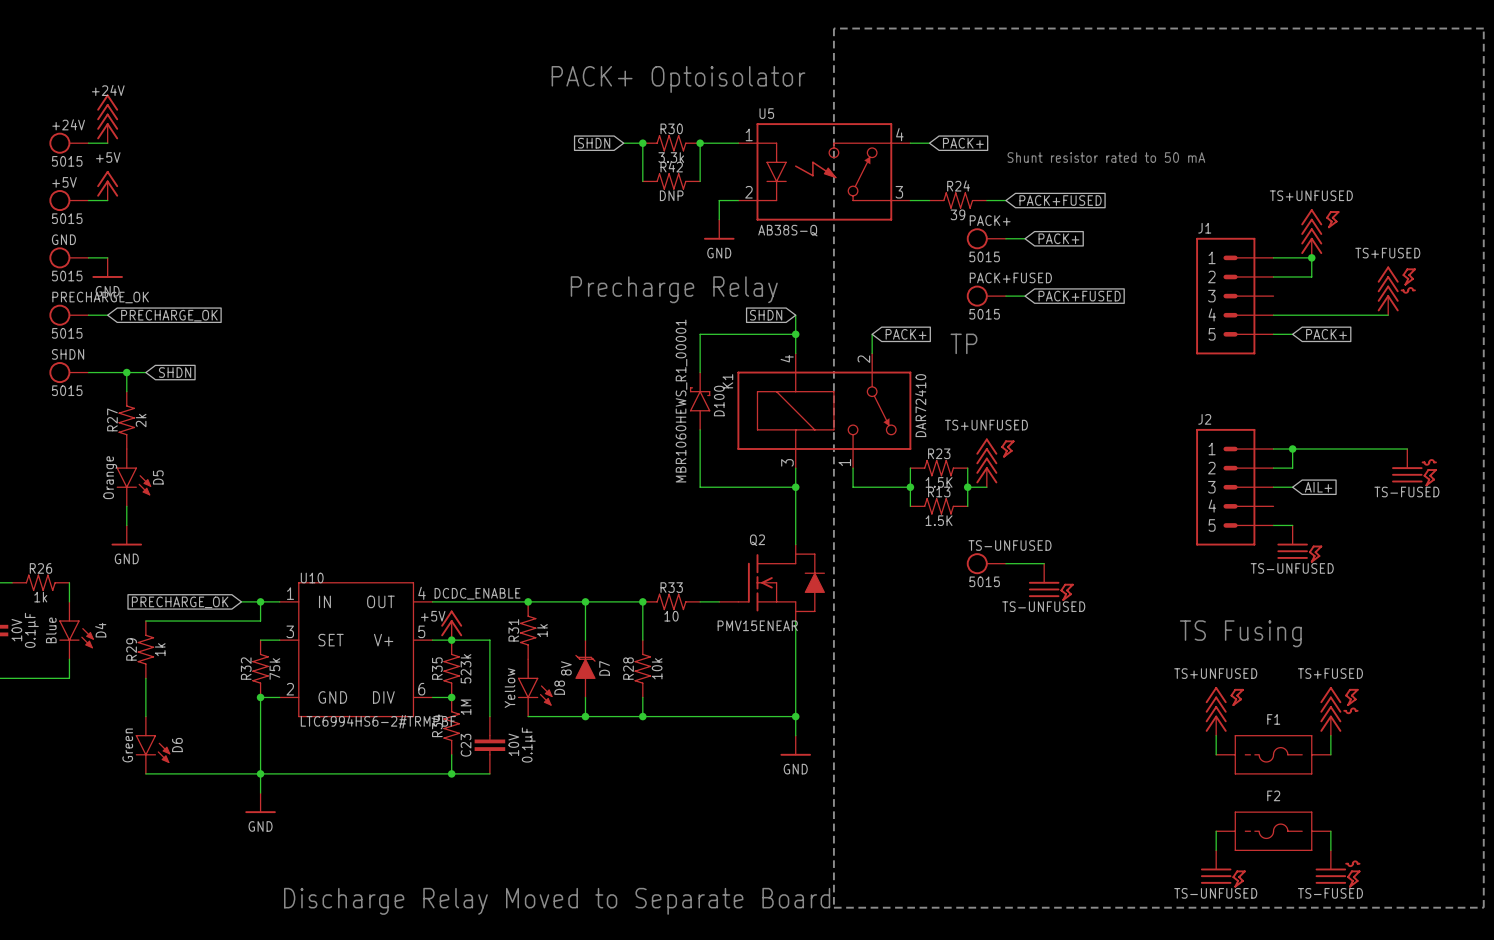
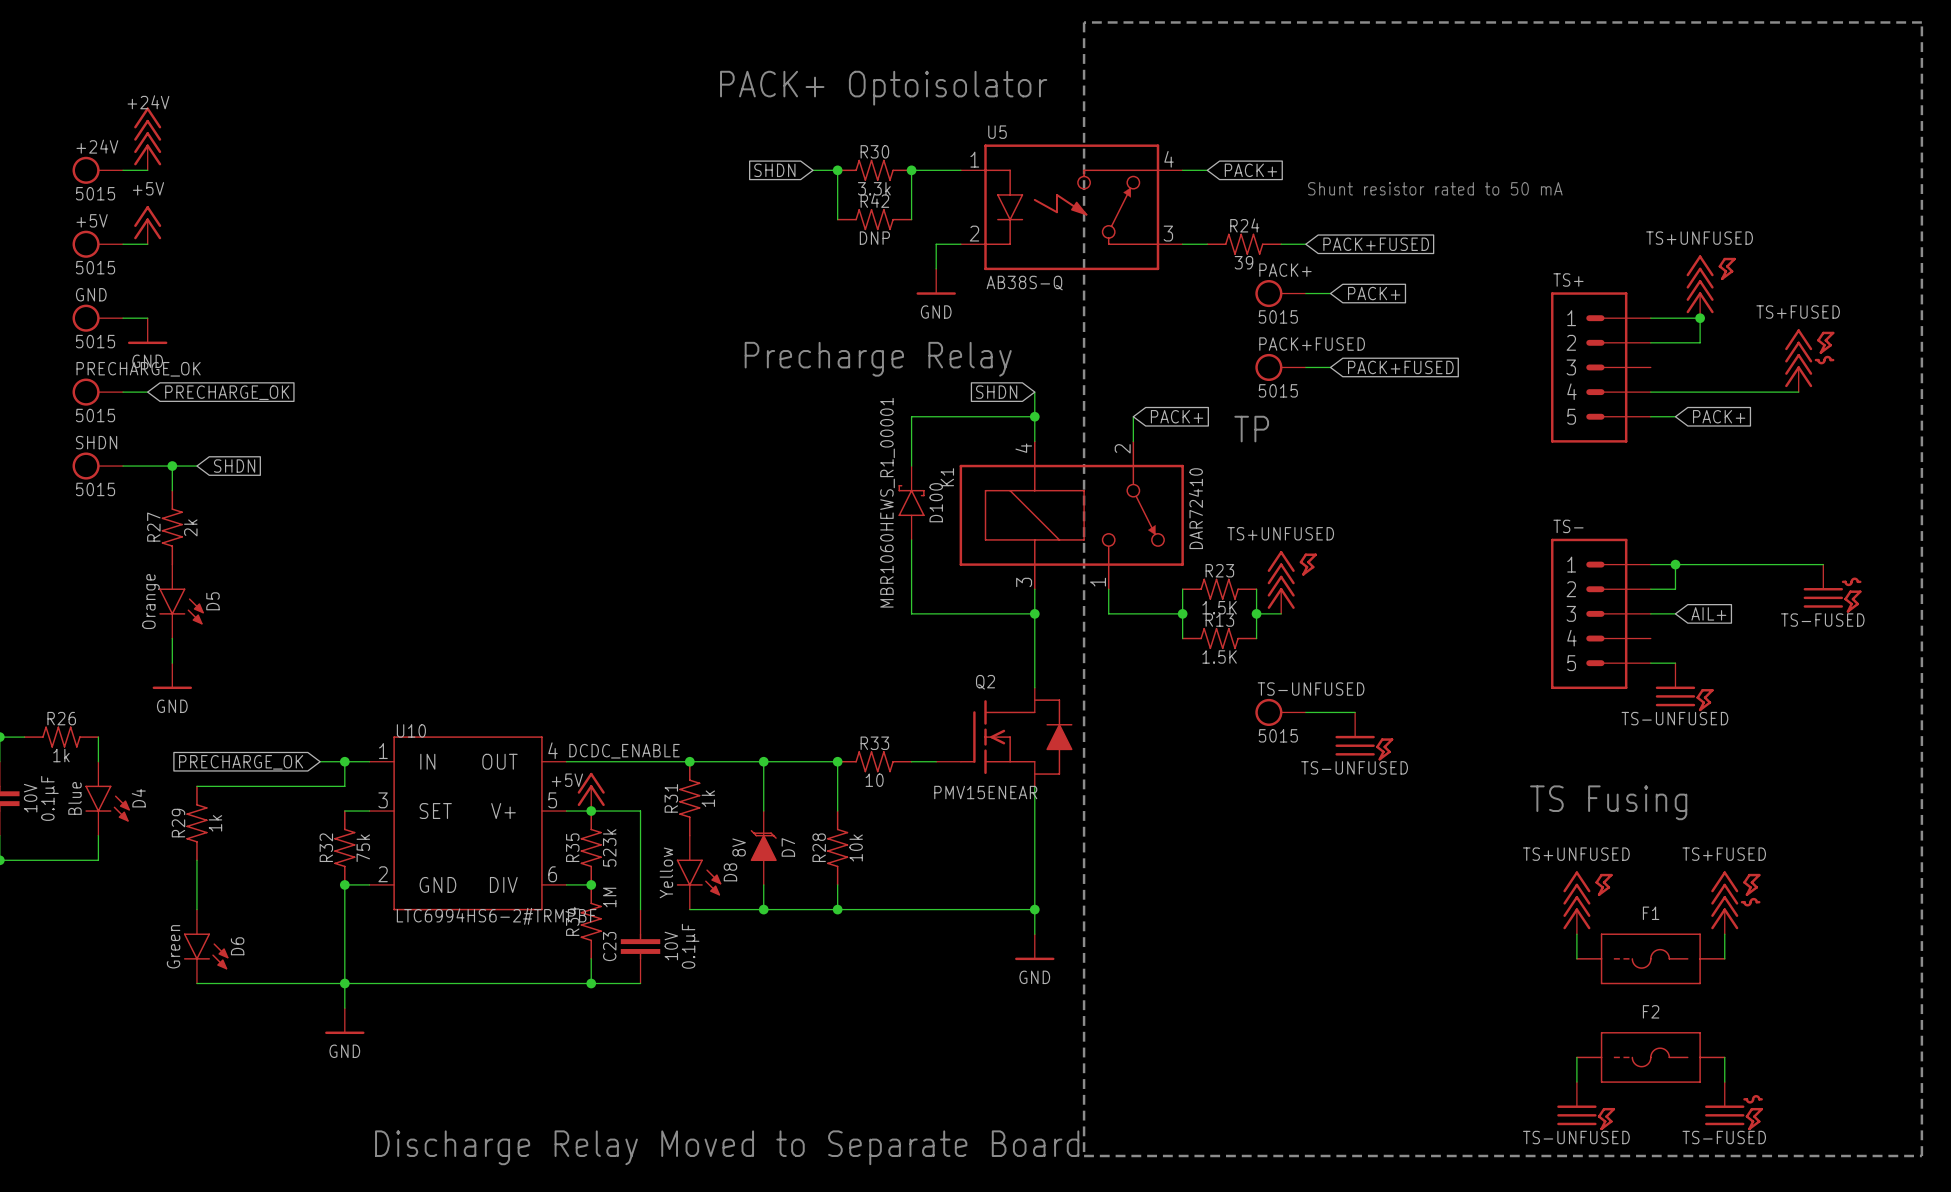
J1 name: J1 (1204, 228) -> TS+ (1568, 279)
J2 name: J2 (1204, 419) -> TS- (1568, 526)

